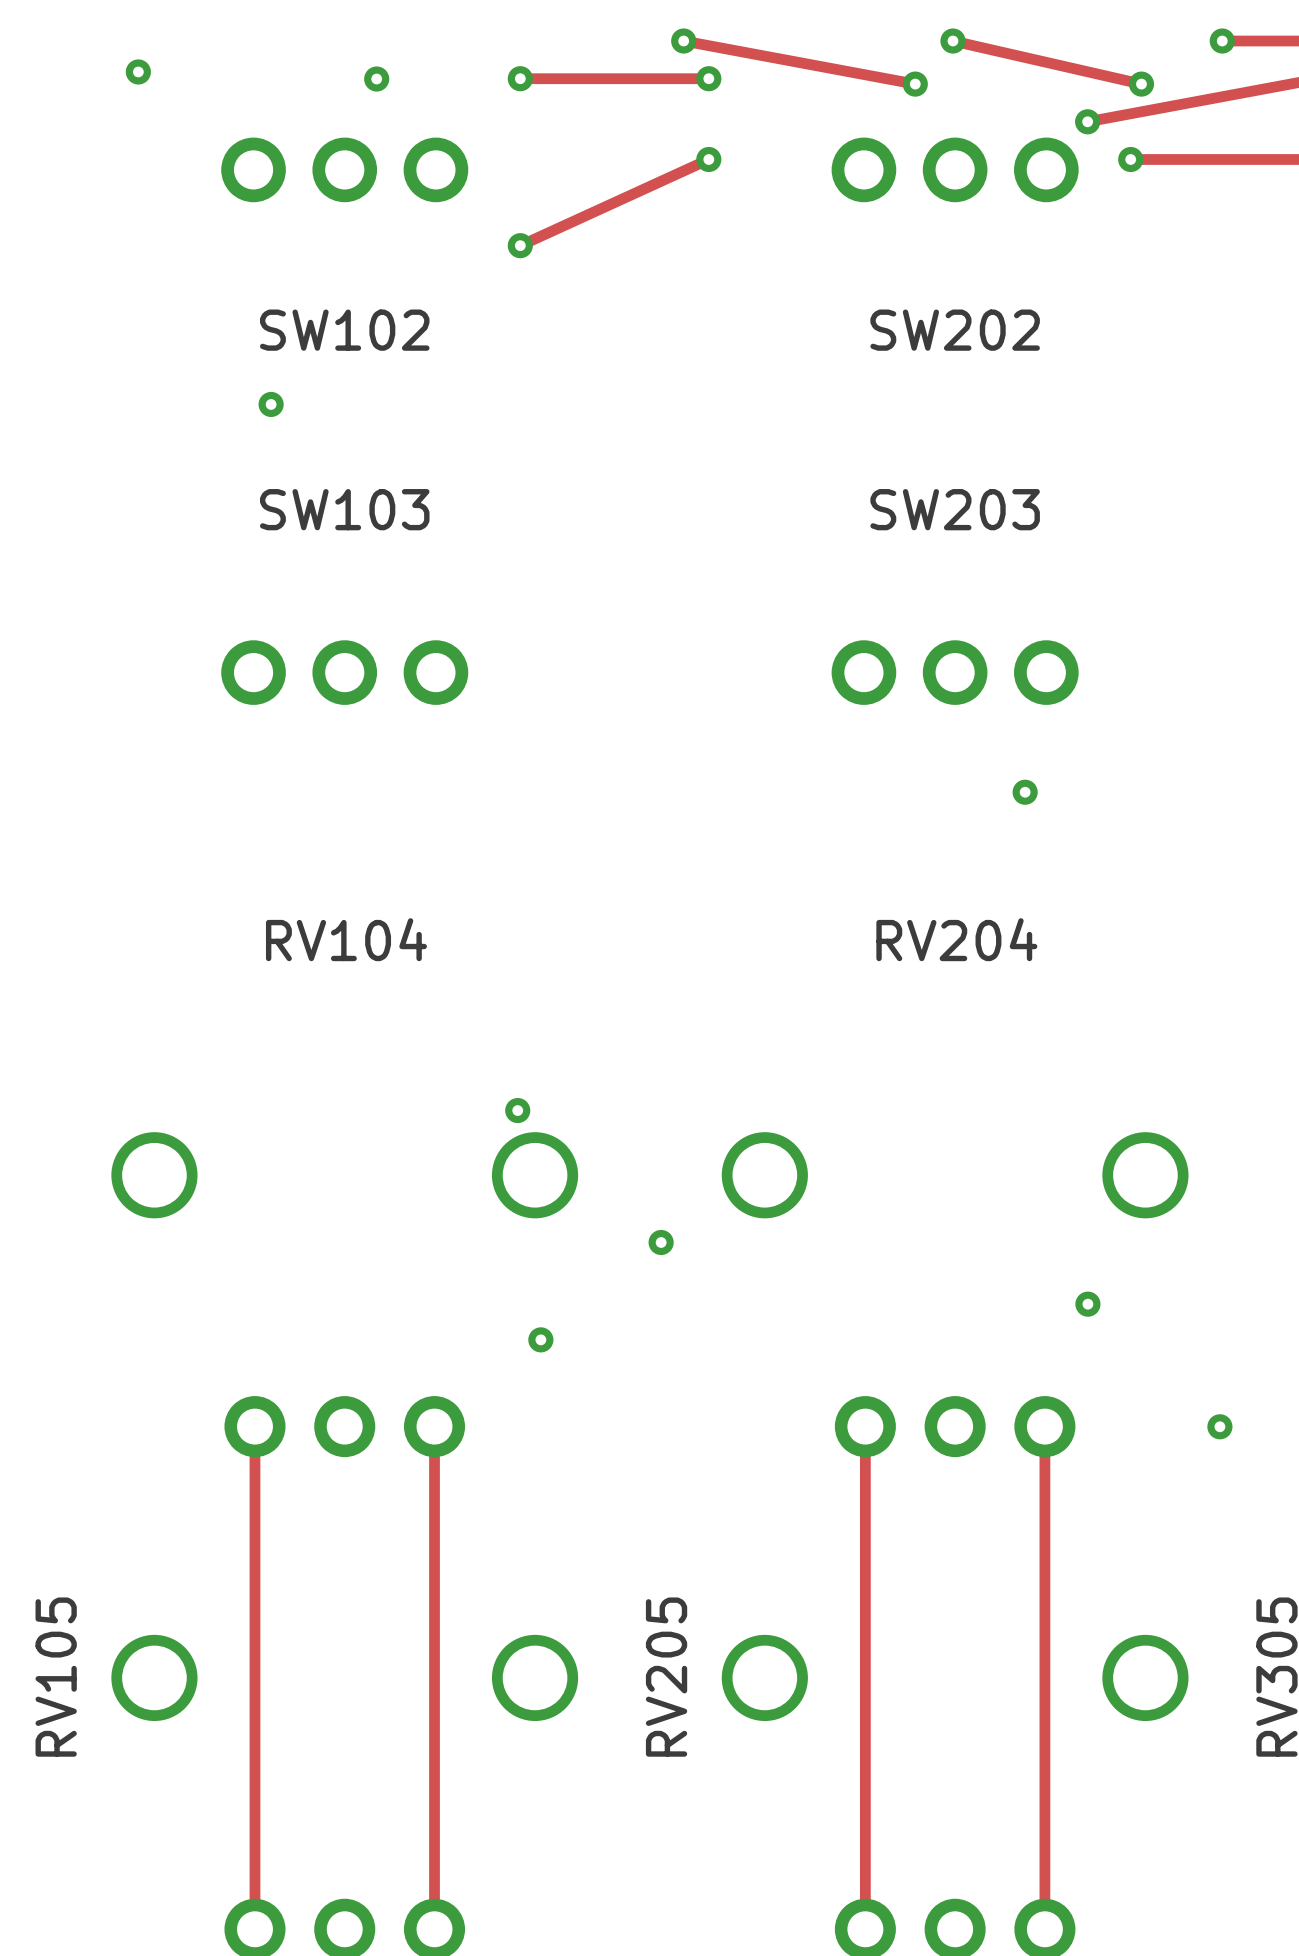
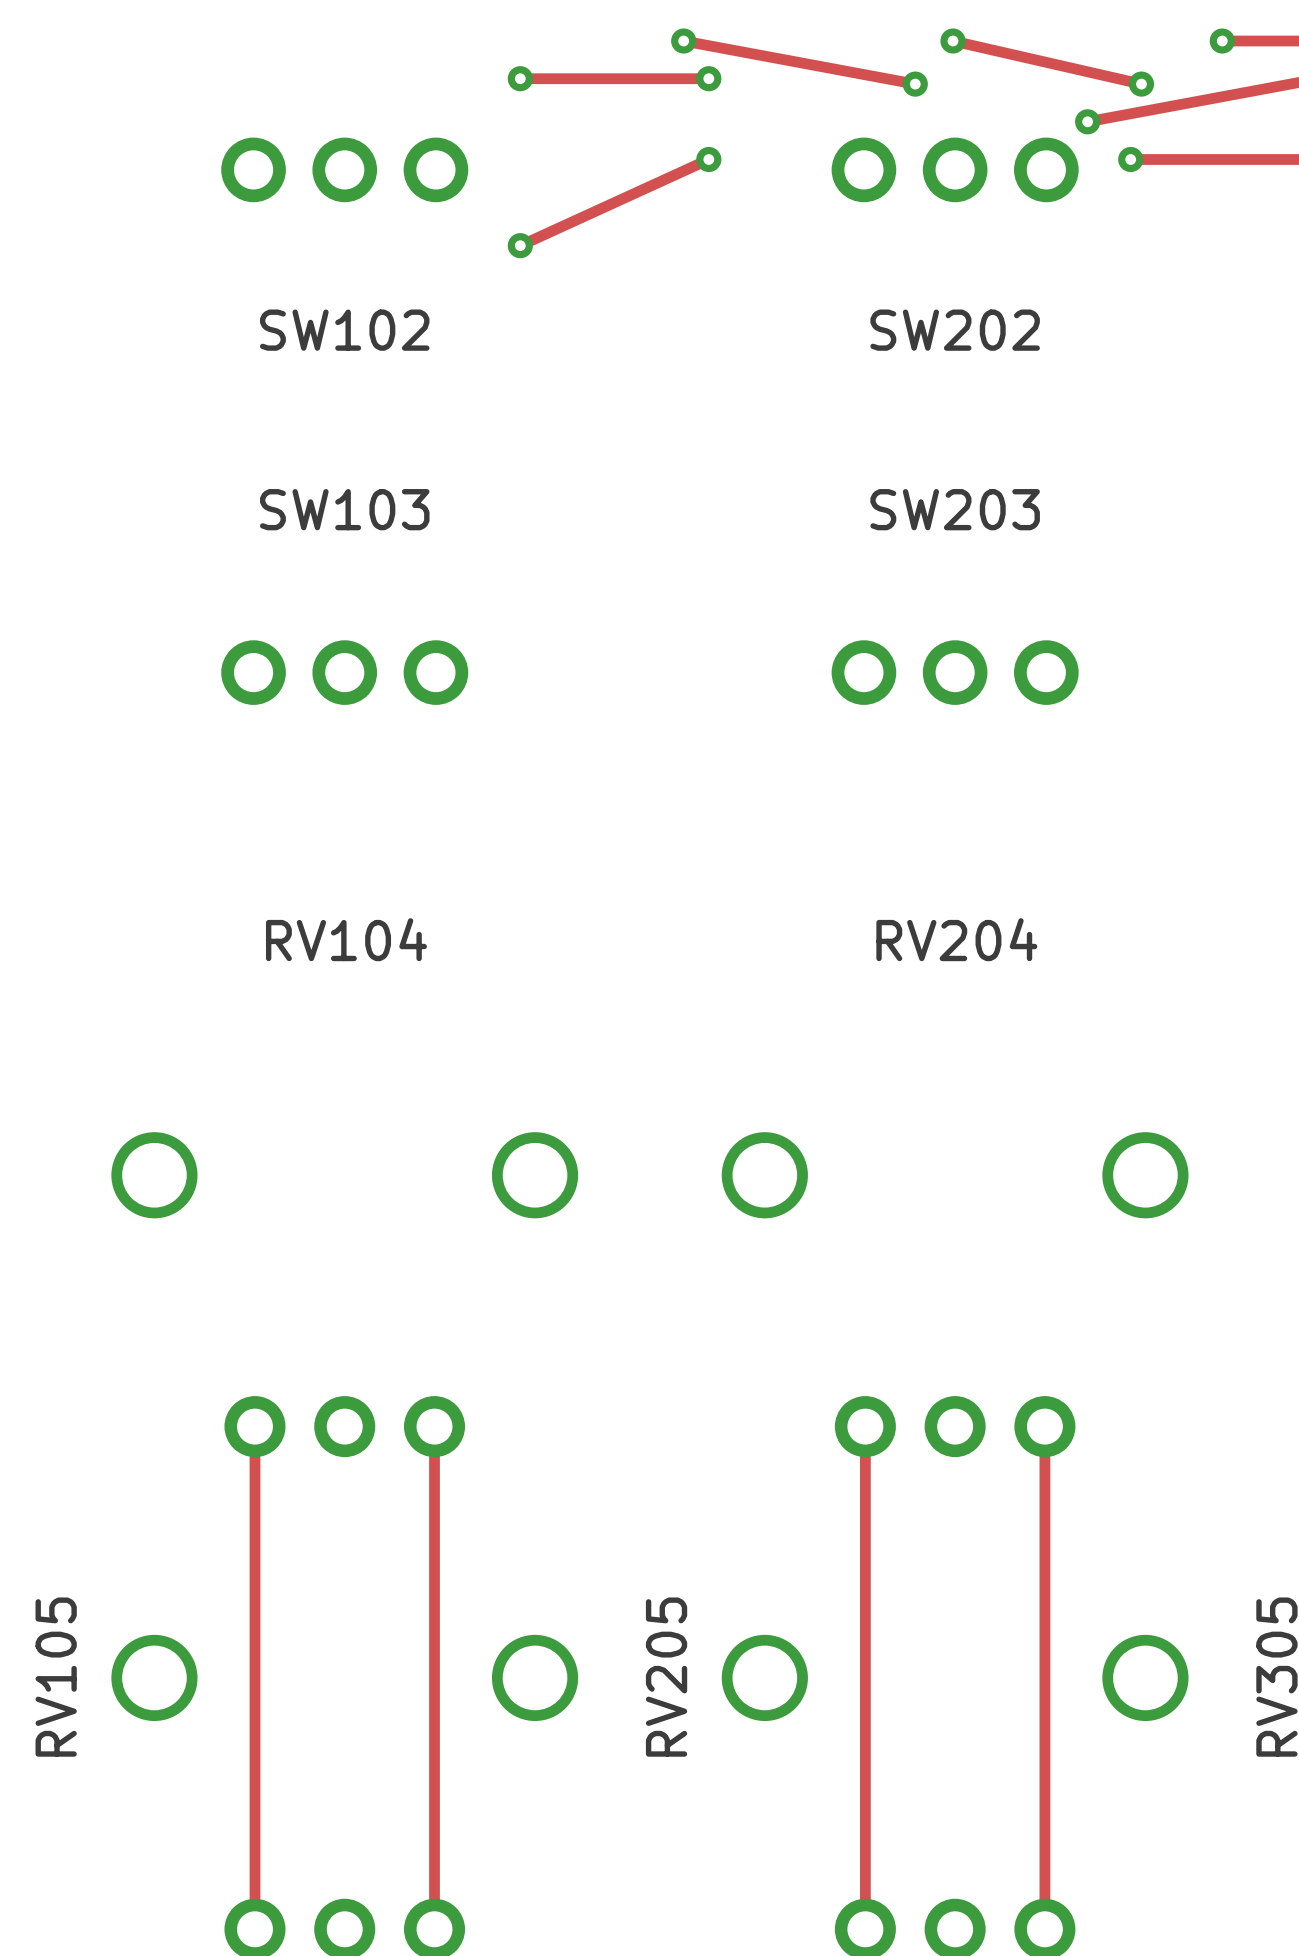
via: (138, 71) -> none
via: (376, 79) -> none
via: (271, 404) -> none
via: (1025, 792) -> none
via: (517, 1110) -> none
via: (661, 1242) -> none
via: (1087, 1304) -> none
via: (540, 1339) -> none
via: (1219, 1426) -> none

